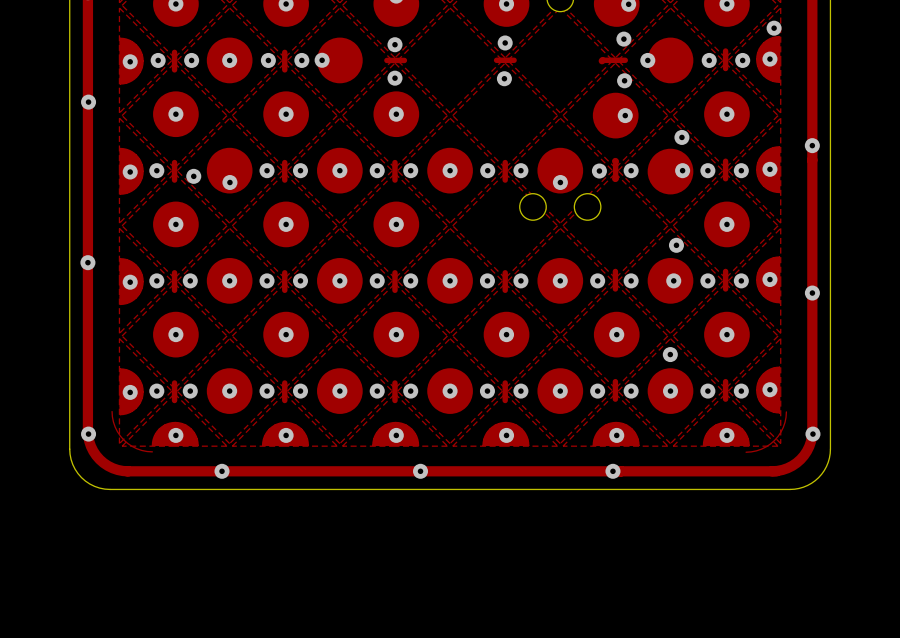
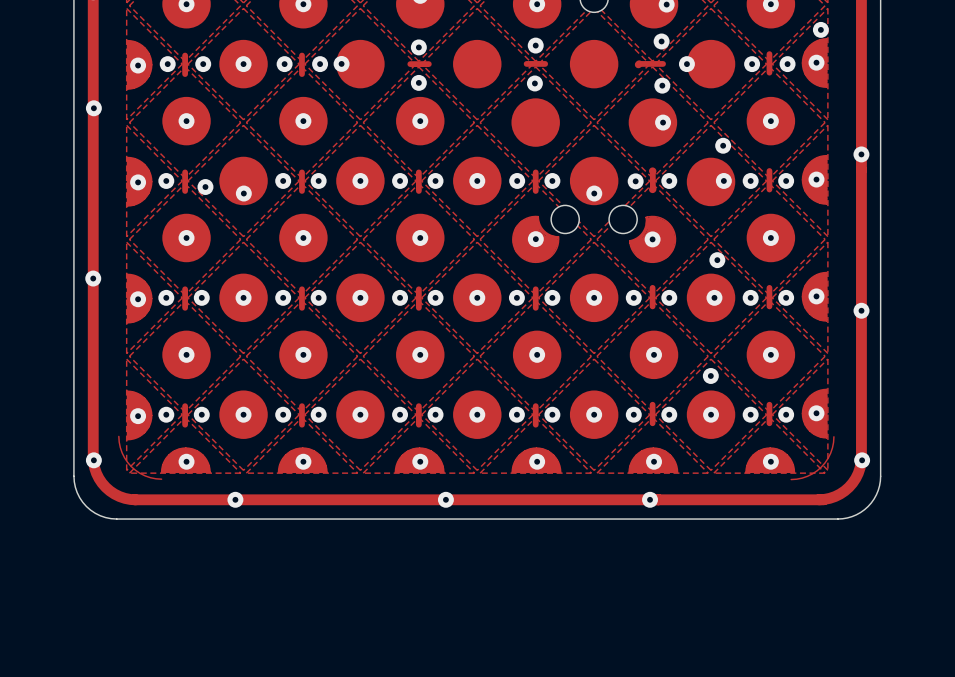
part: none -> (477, 64)
part: none -> (594, 64)
part: none -> (535, 122)
part: none -> (535, 239)
via: none -> (535, 239)
part: none -> (652, 239)
via: none -> (652, 239)

